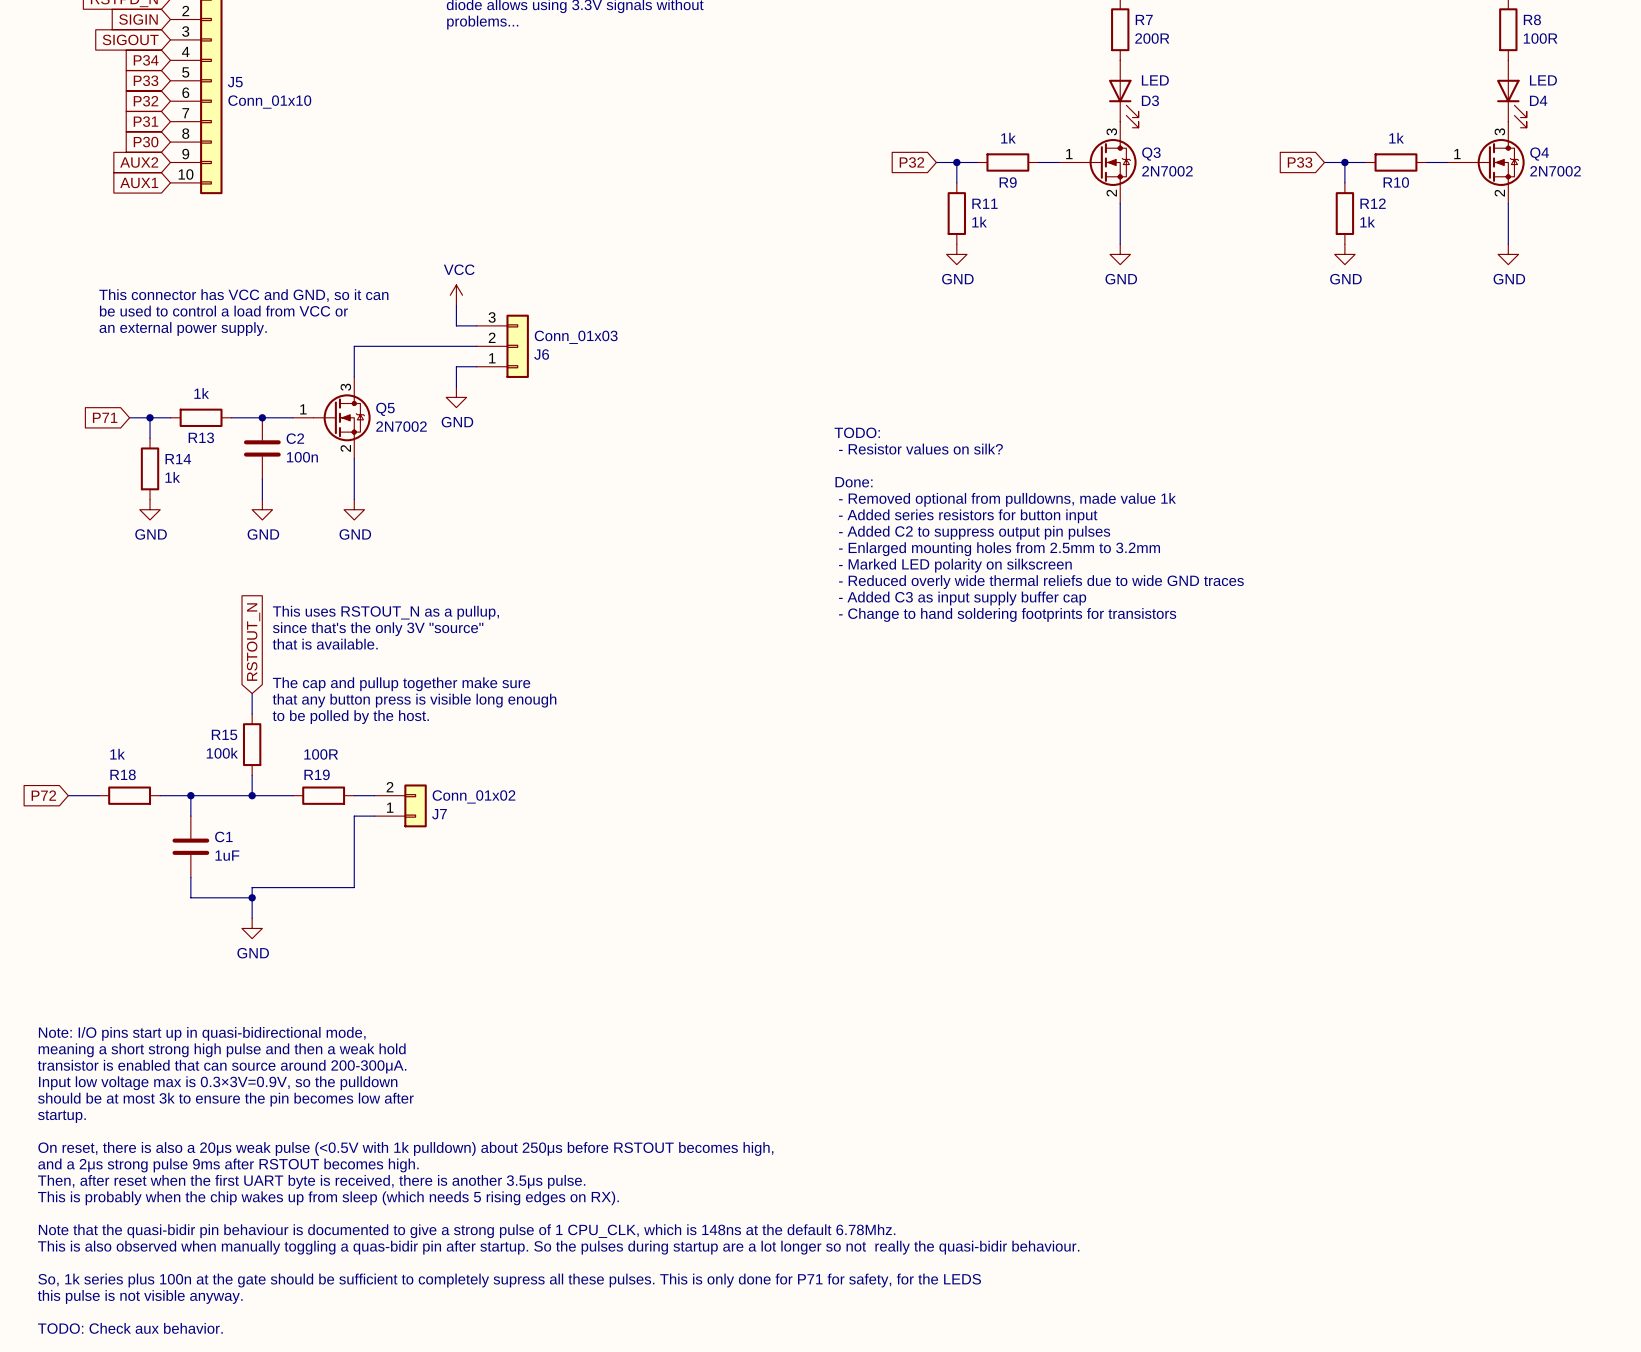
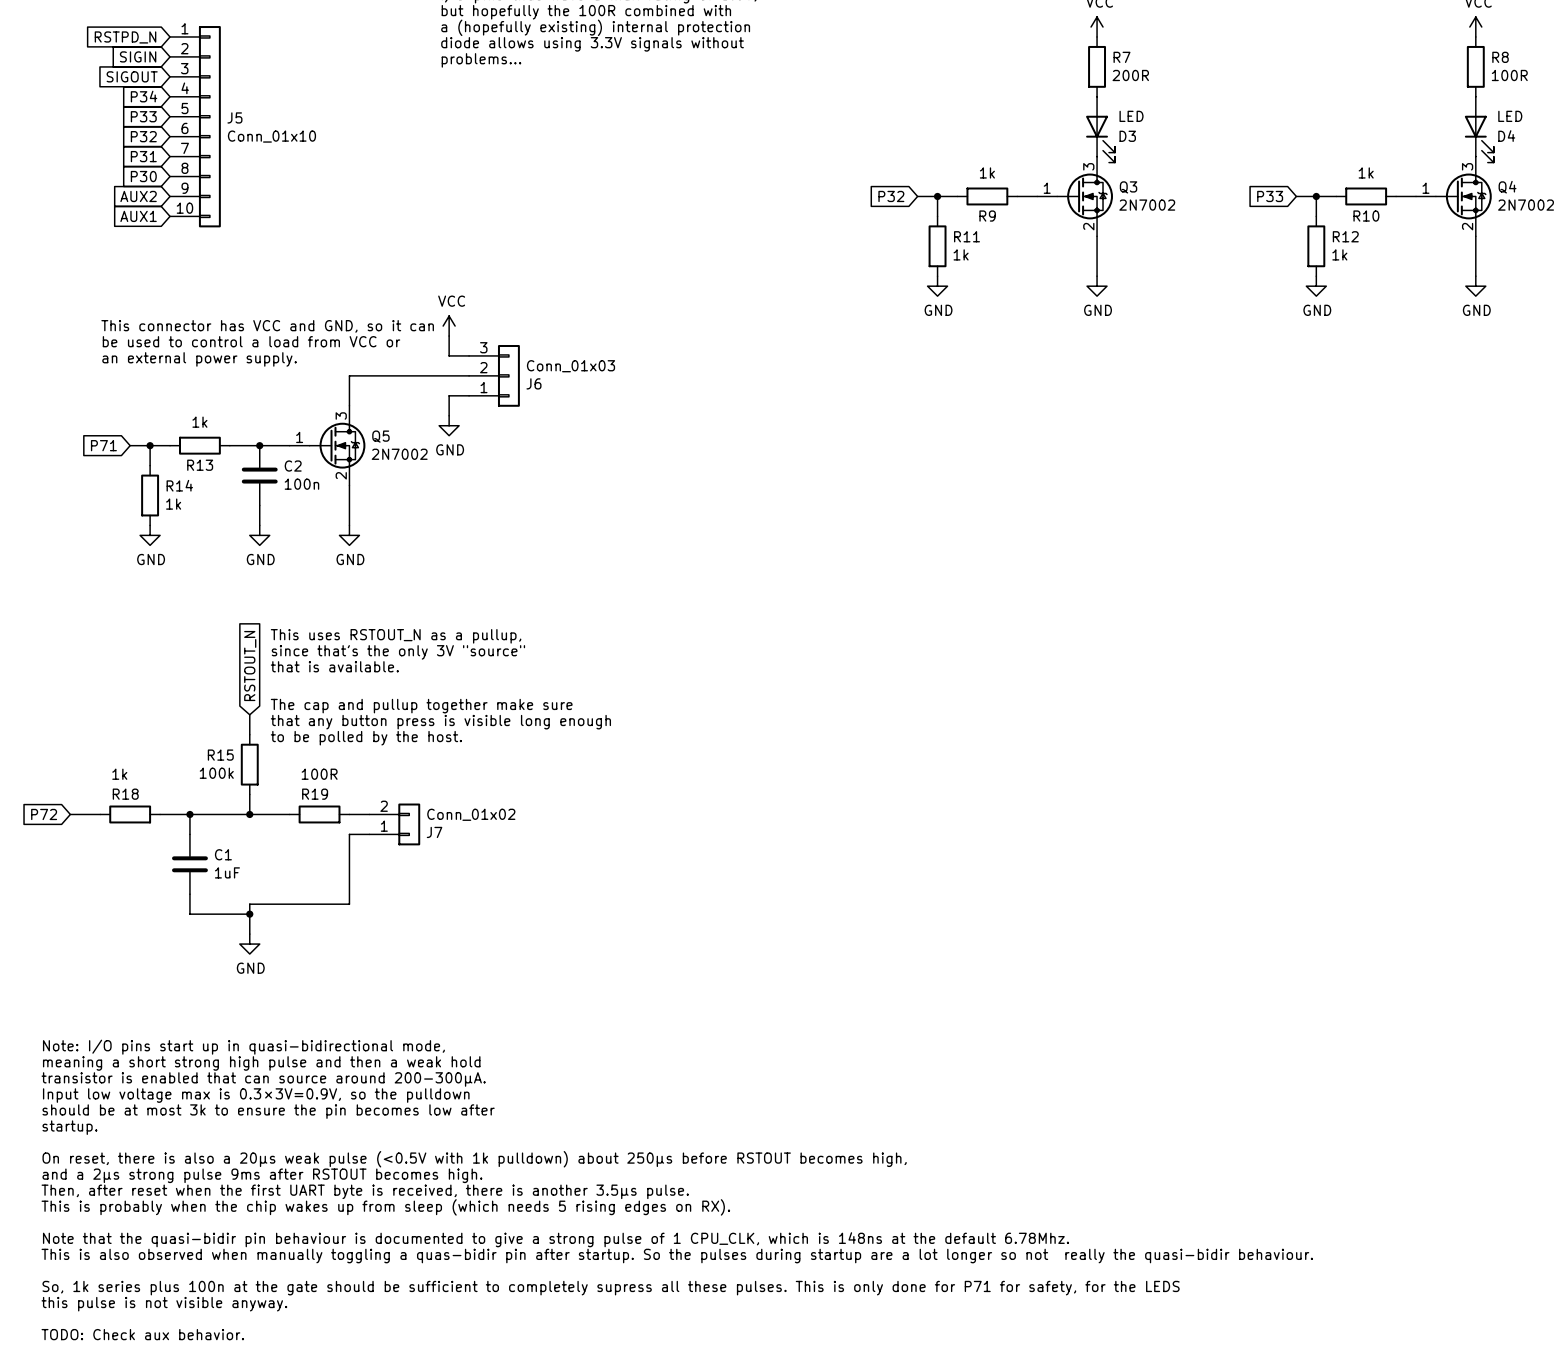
text: TODO: (857, 432) -> none
text: - Resistor values on silk? (920, 449) -> none
text: Done: (854, 482) -> none
text: - Removed optional from pulldowns, made value 1k (1007, 499) -> none
text: - Added series resistors for button input (968, 516) -> none
text: - Added C2 to suppress output pin pulses (974, 532) -> none
text: - Enlarged mounting holes from 2.5mm to 3.2mm (999, 549) -> none
text: - Marked LED polarity on silkscreen (955, 565) -> none
text: - Reduced overly wide thermal reliefs due to wide GND traces (1041, 582) -> none
text: - Added C3 as input supply buffer cap (962, 598) -> none
text: - Change to hand soldering footprints for transistors (1007, 614) -> none

